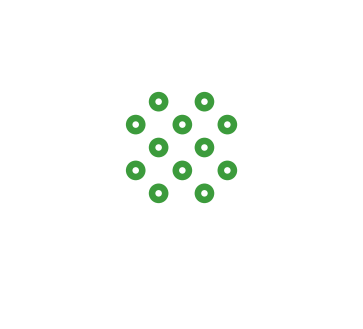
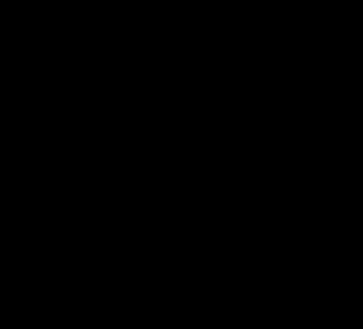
part: (181, 147) -> none

